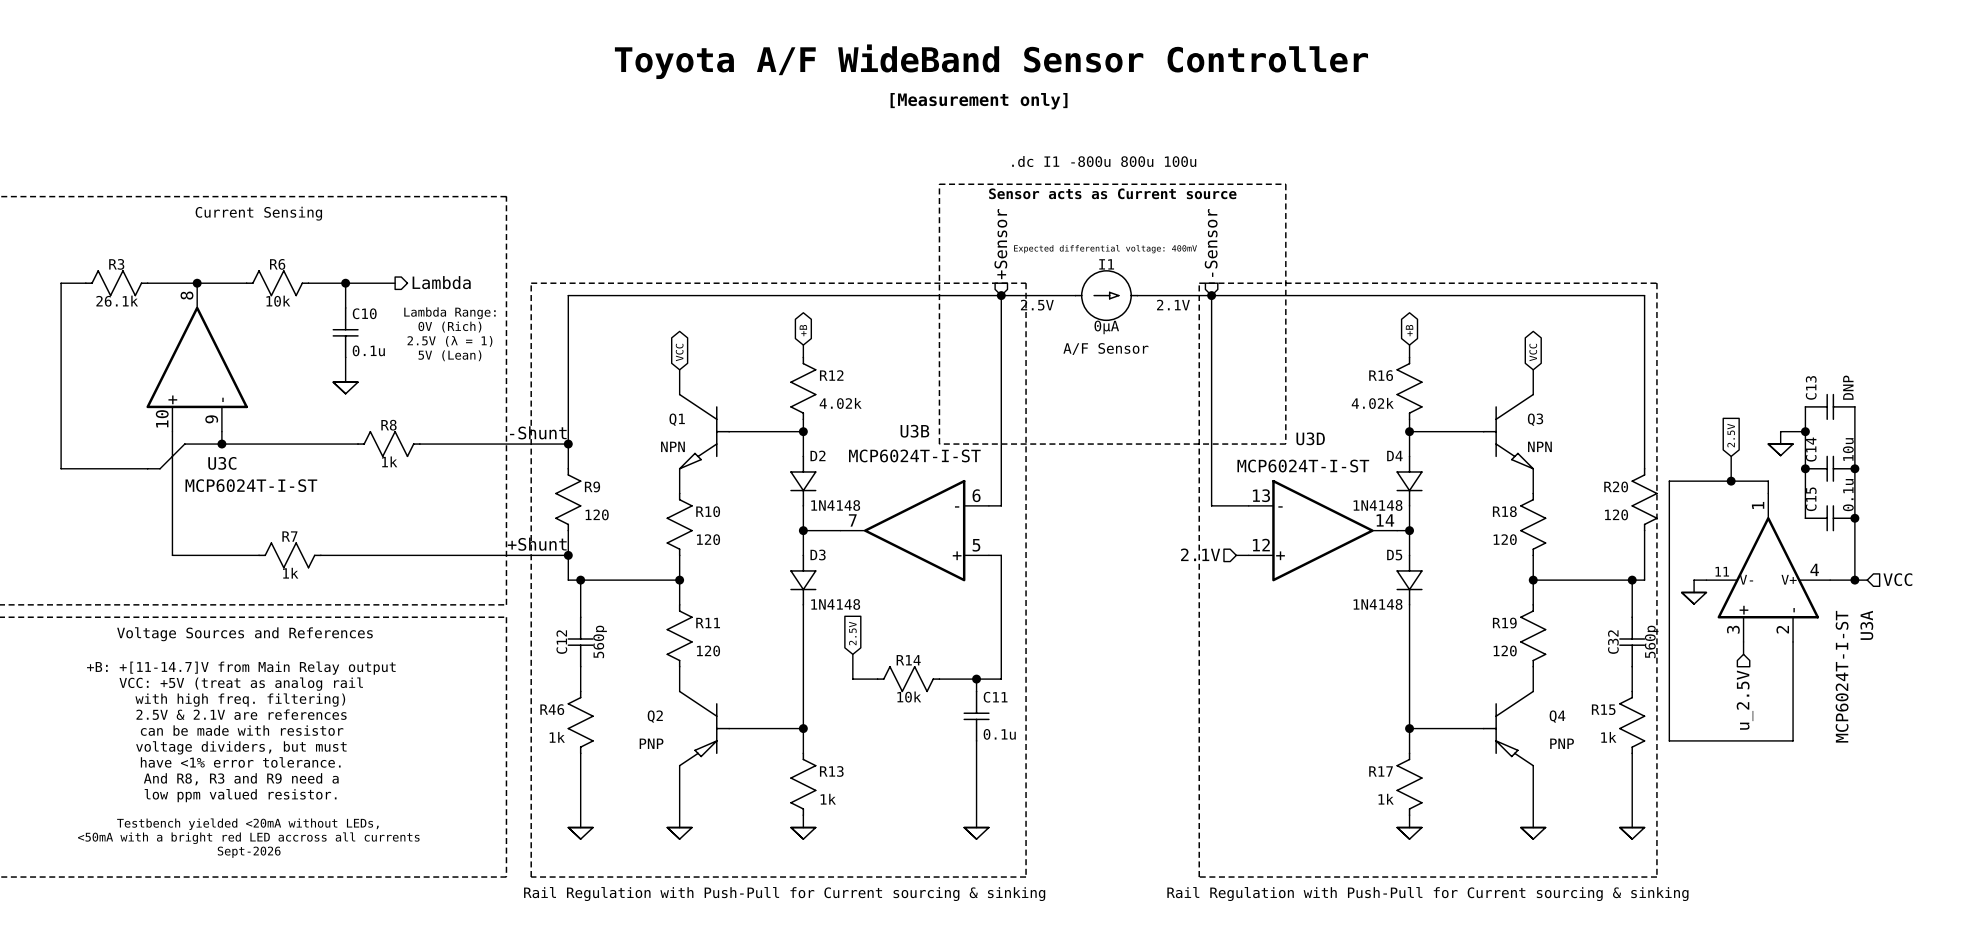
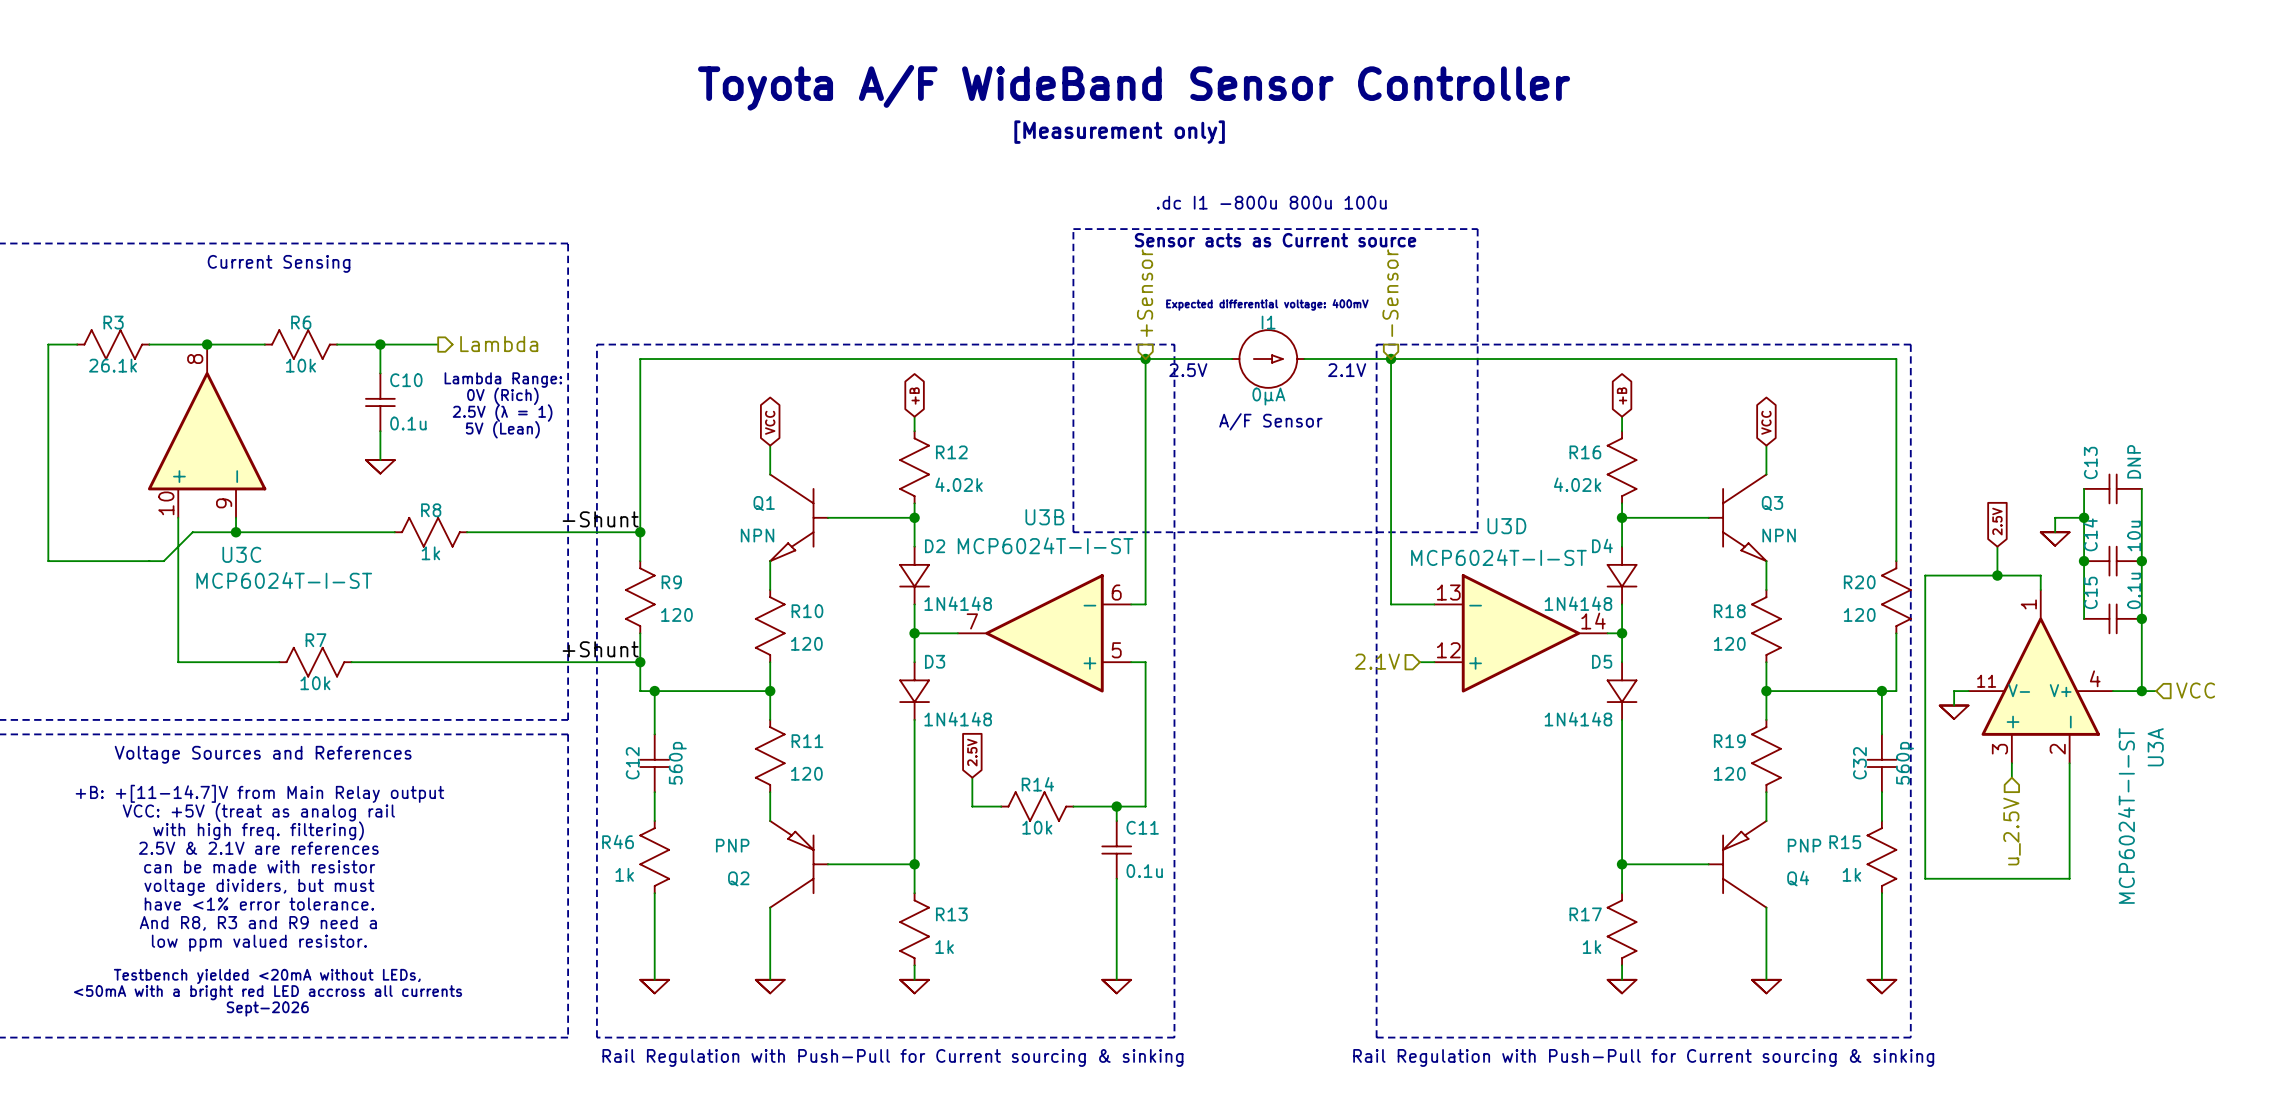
R7 value: 1k (290, 573) -> 10k (315, 683)
Q2 flip: as is (704, 728) -> up-down (799, 864)
Q4 flip: as is (1508, 728) -> up-down (1737, 864)

